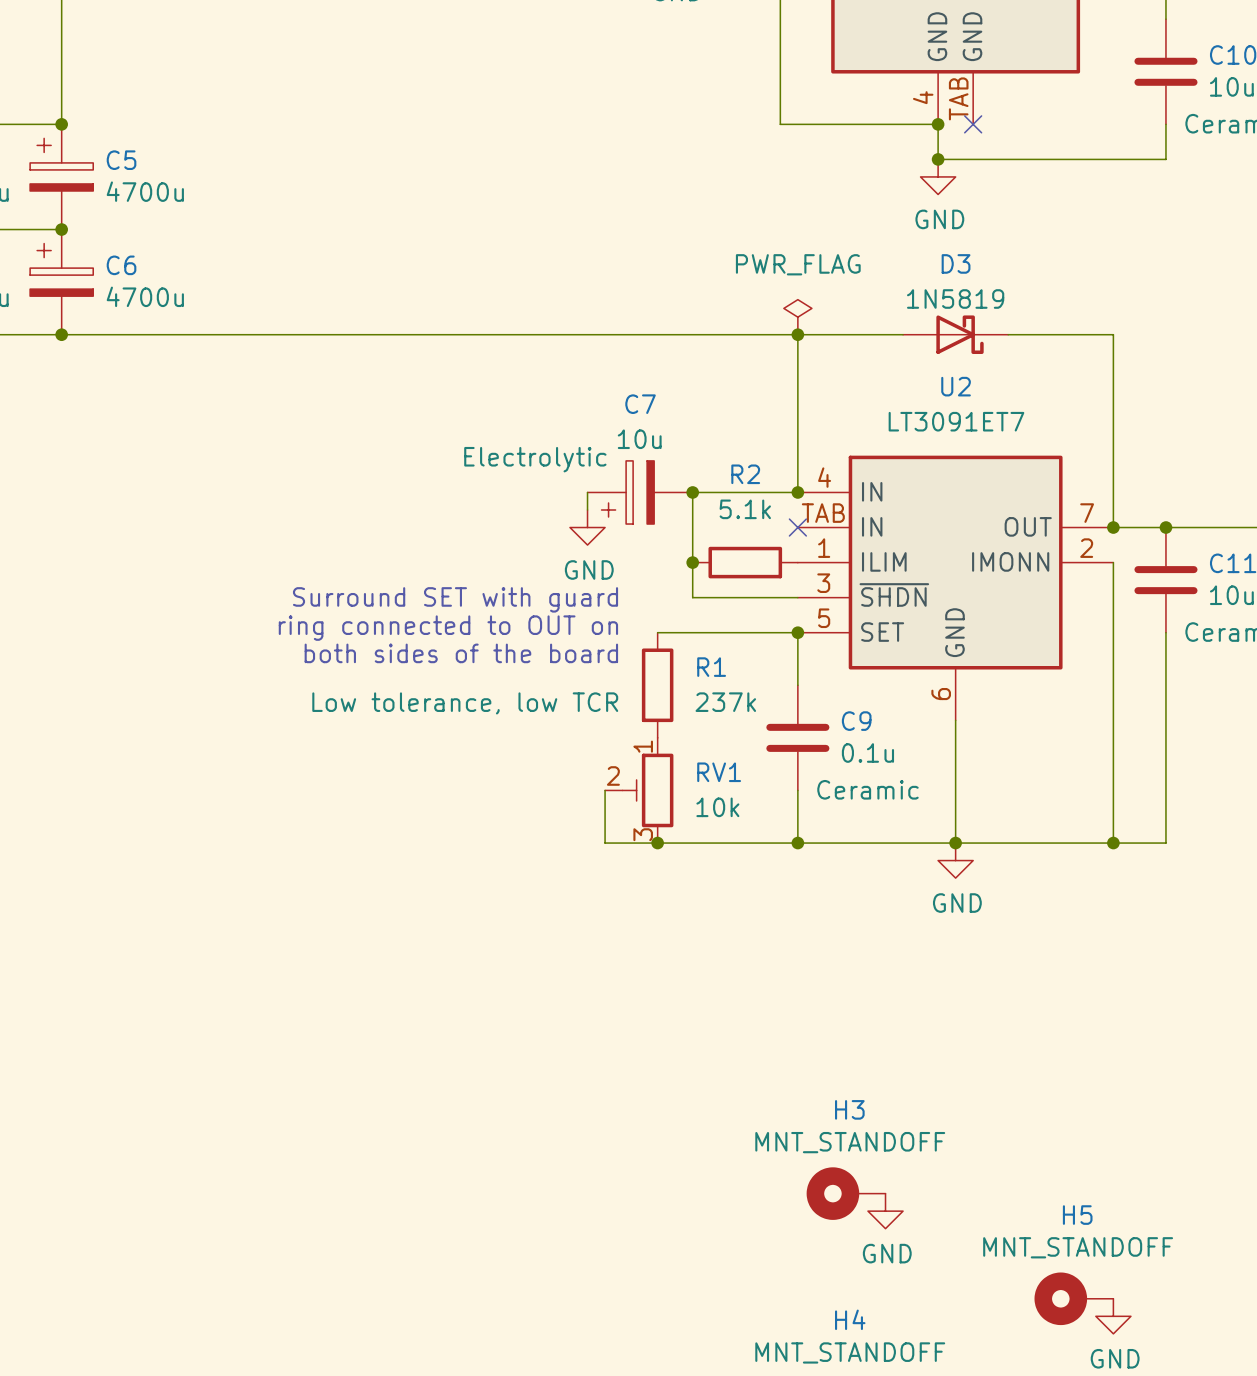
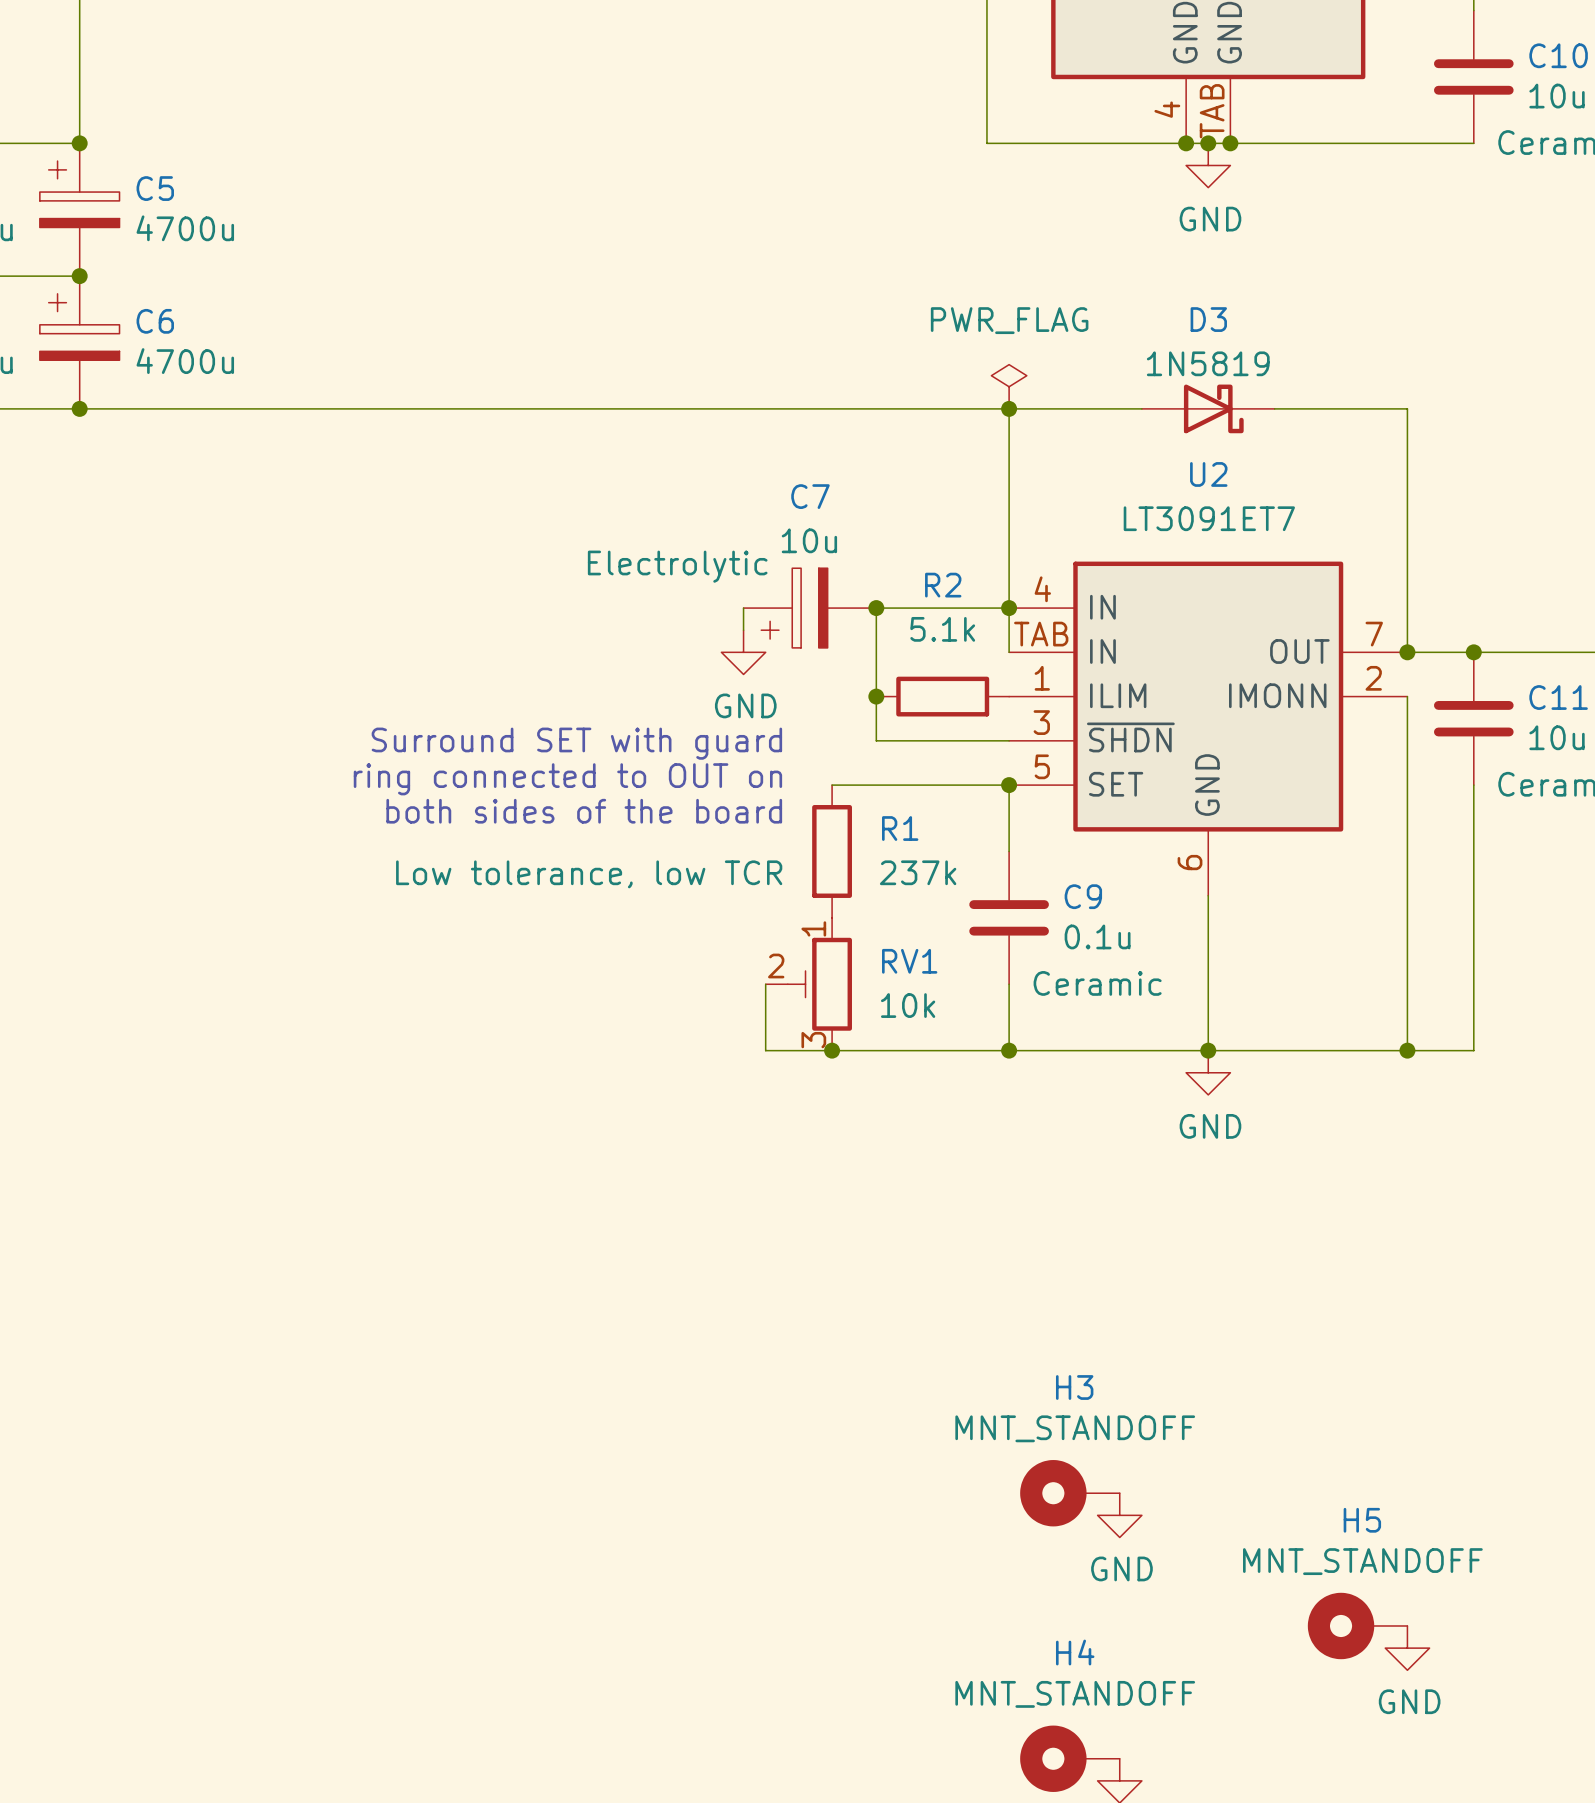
wire: (938, 124) (938, 159) (1165, 159) (1165, 124) -> (1186, 143) (1473, 143)
junction: none -> (1208, 143)
junction: none -> (1230, 143)
no-connect mark: (973, 124) -> none
junction: (938, 159) -> none
power symbol position: GND (938, 176) -> GND (1208, 165)
wire: none -> (1009, 608) (1009, 652)
no-connect mark: (797, 527) -> none

